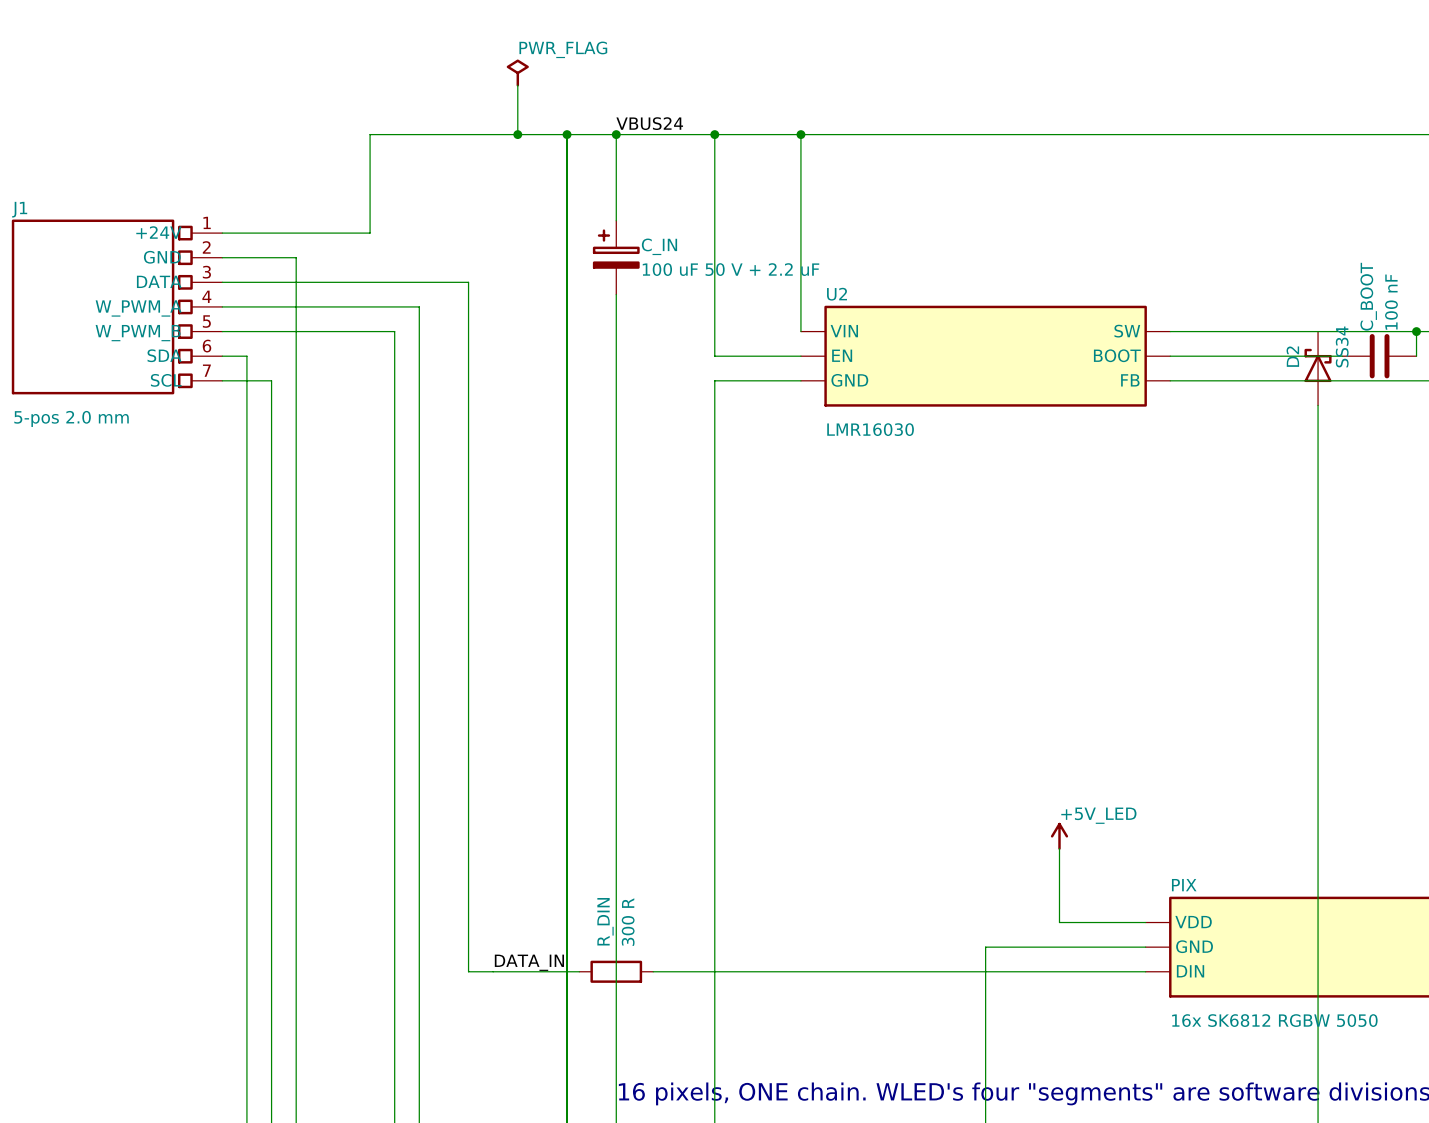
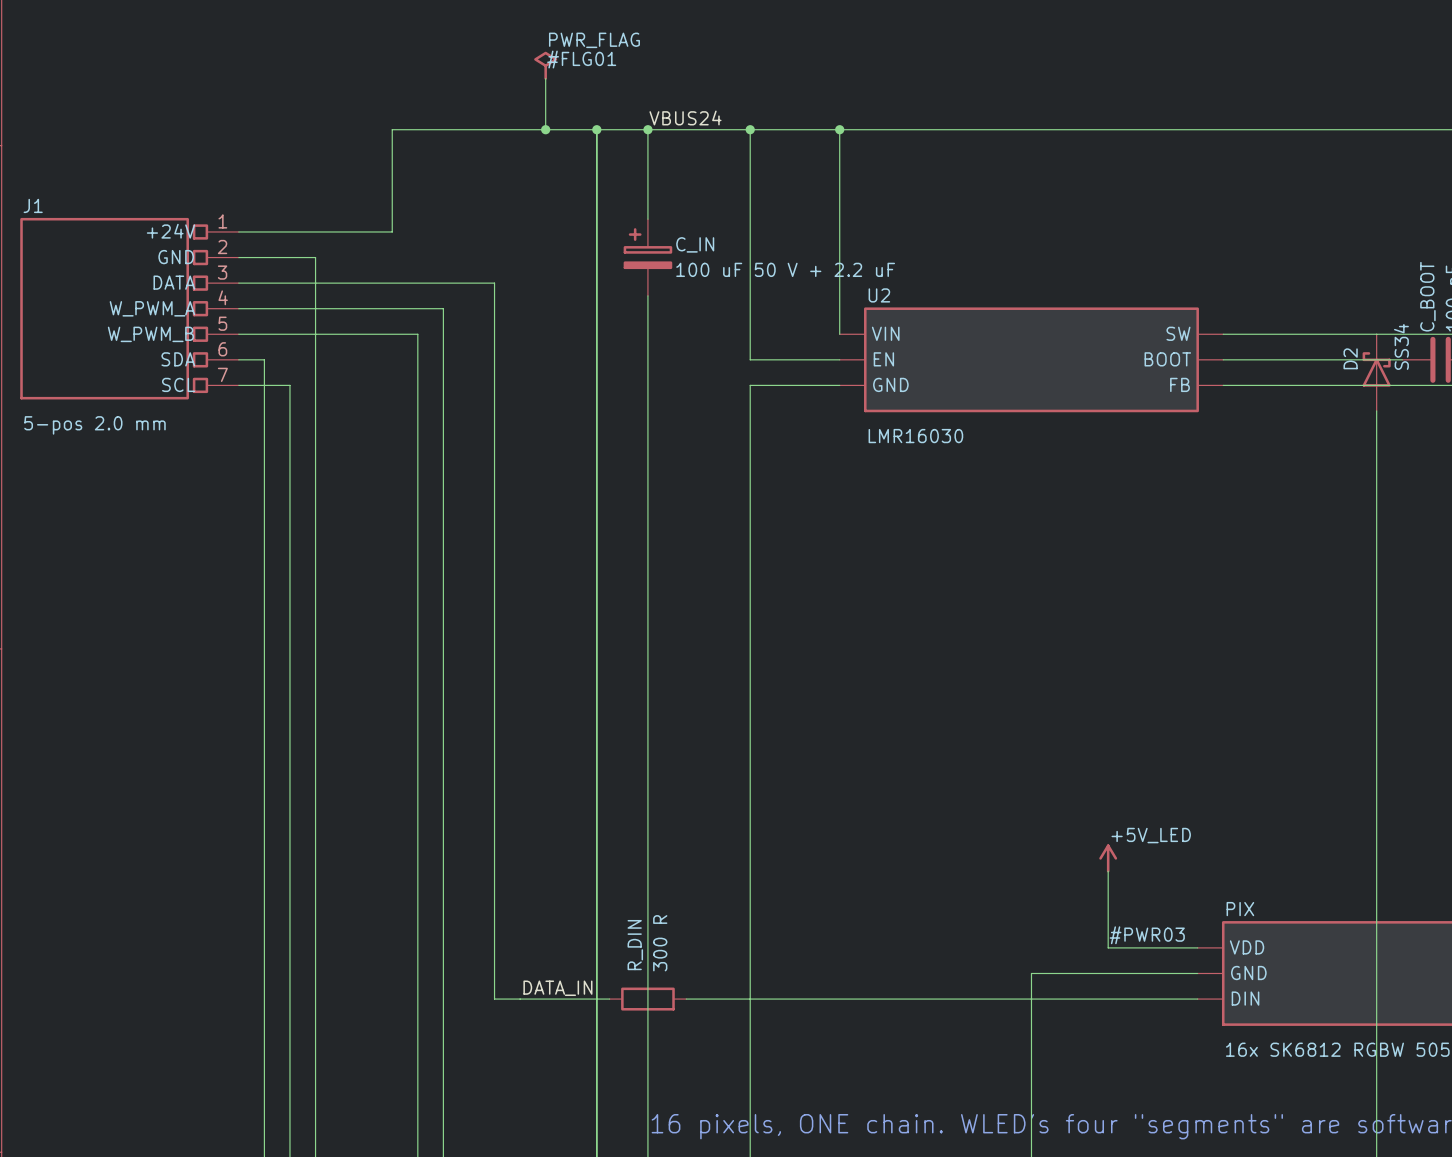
#FLG01 name: none -> #FLG01 (581, 59)
#PWR03 name: none -> #PWR03 (1147, 935)

